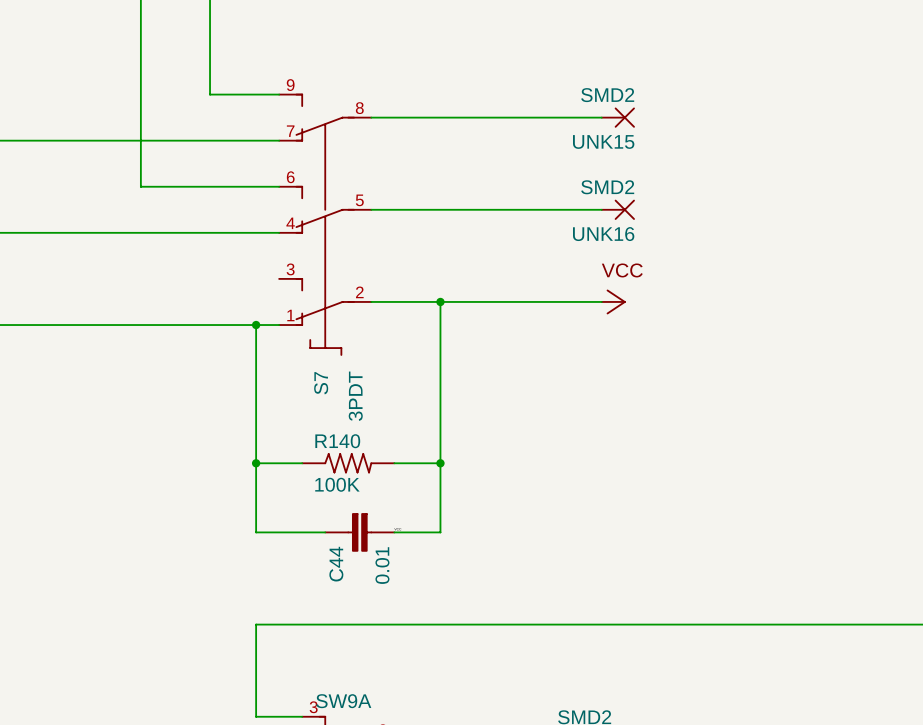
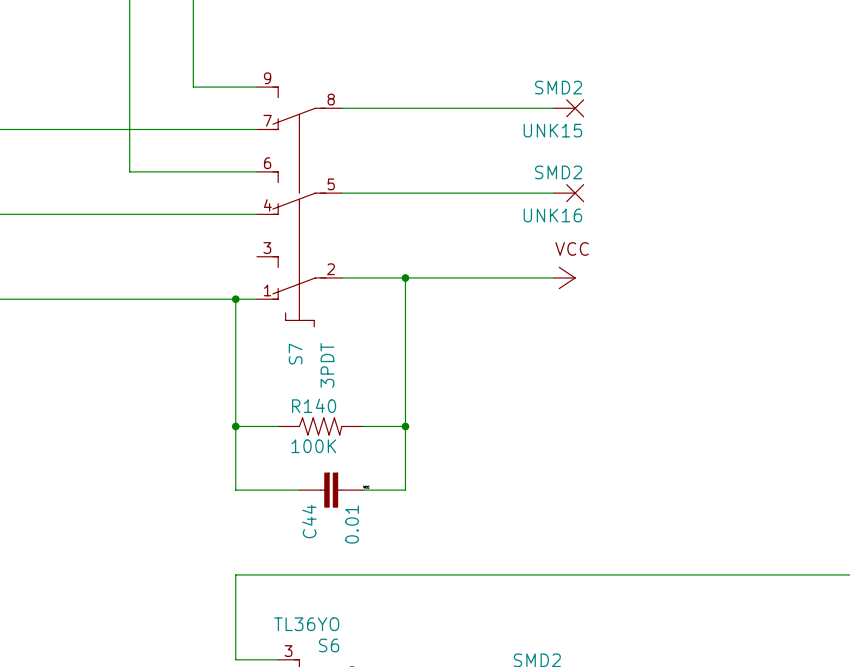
SW9A value: none -> TL36YO (306, 624)
SW9A name: SW9A (343, 701) -> S6 (329, 645)

